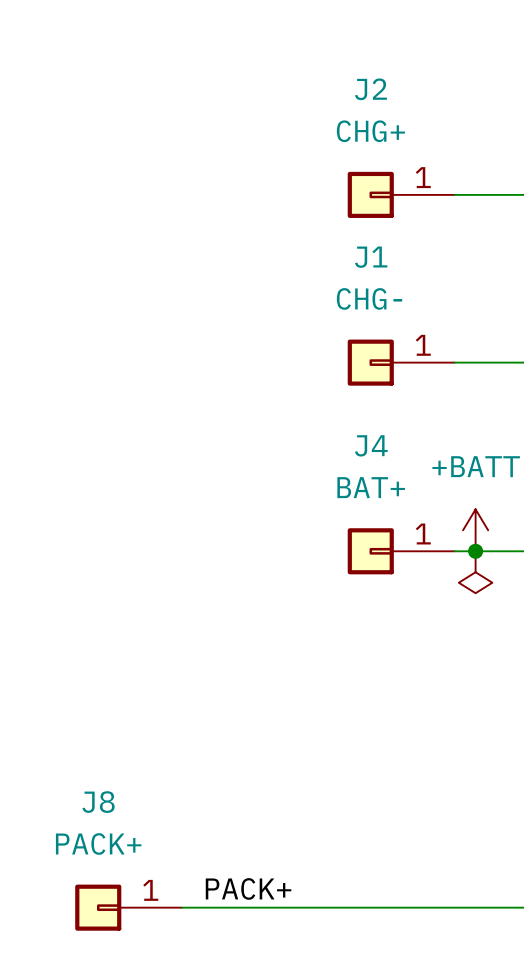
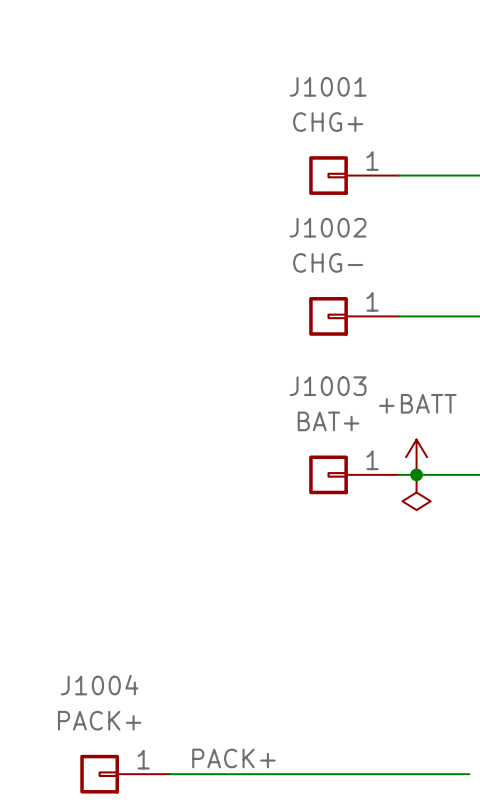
J2 name: J2 (370, 89) -> J1001 (328, 86)
J1 name: J1 (371, 257) -> J1002 (328, 227)
J4 name: J4 (371, 445) -> J1003 (328, 386)
J8 name: J8 (98, 802) -> J1004 (99, 685)

